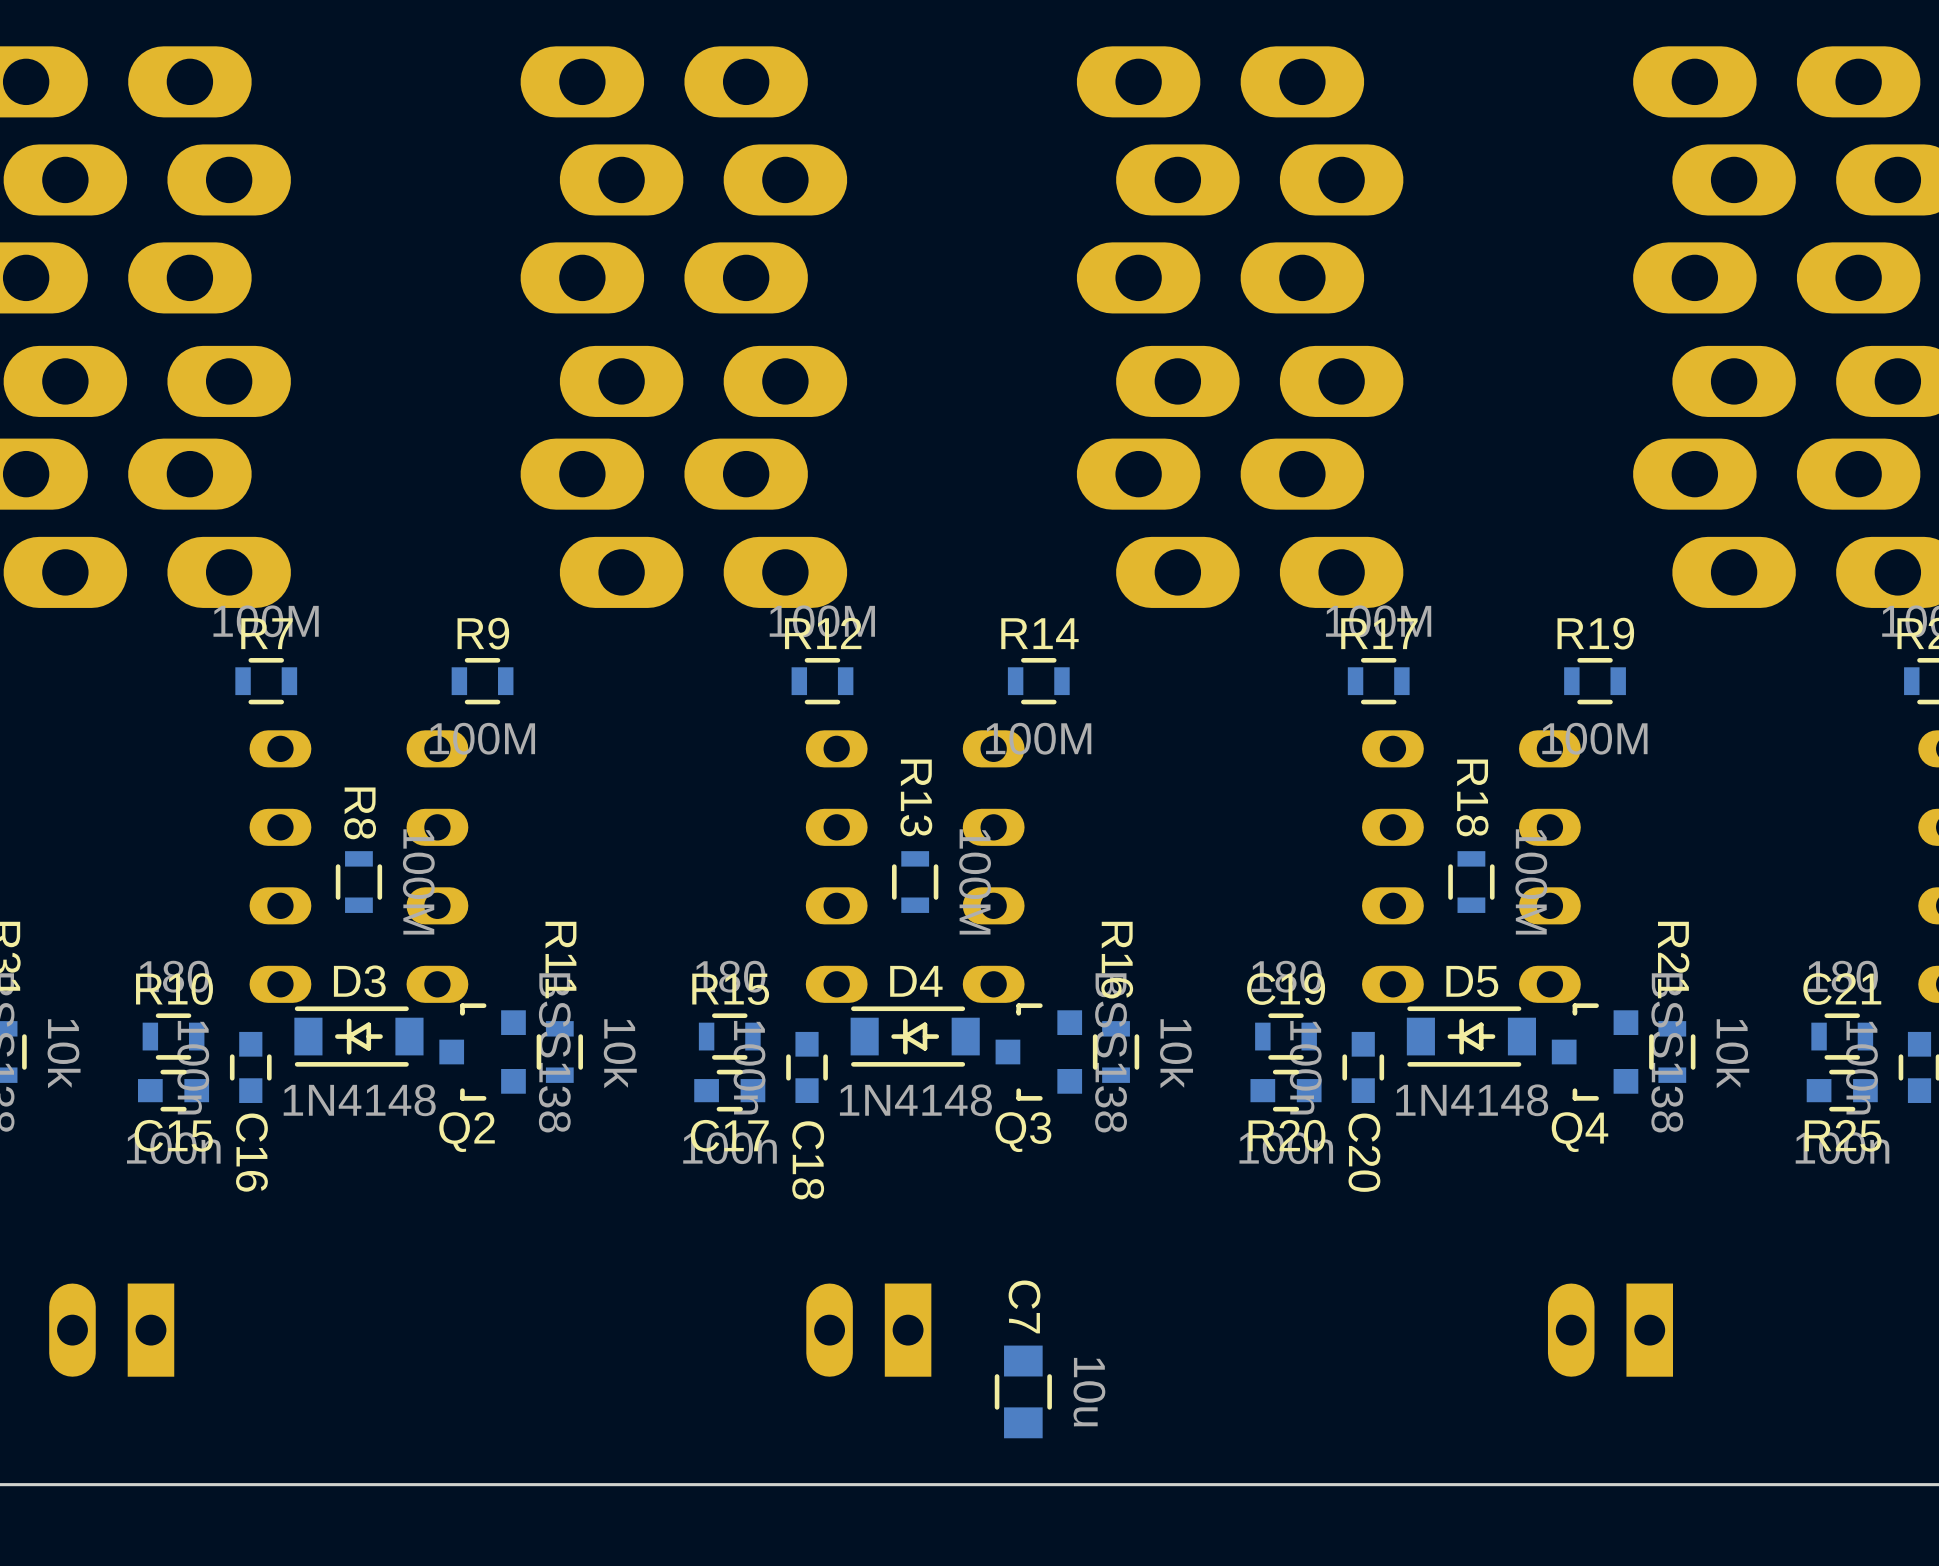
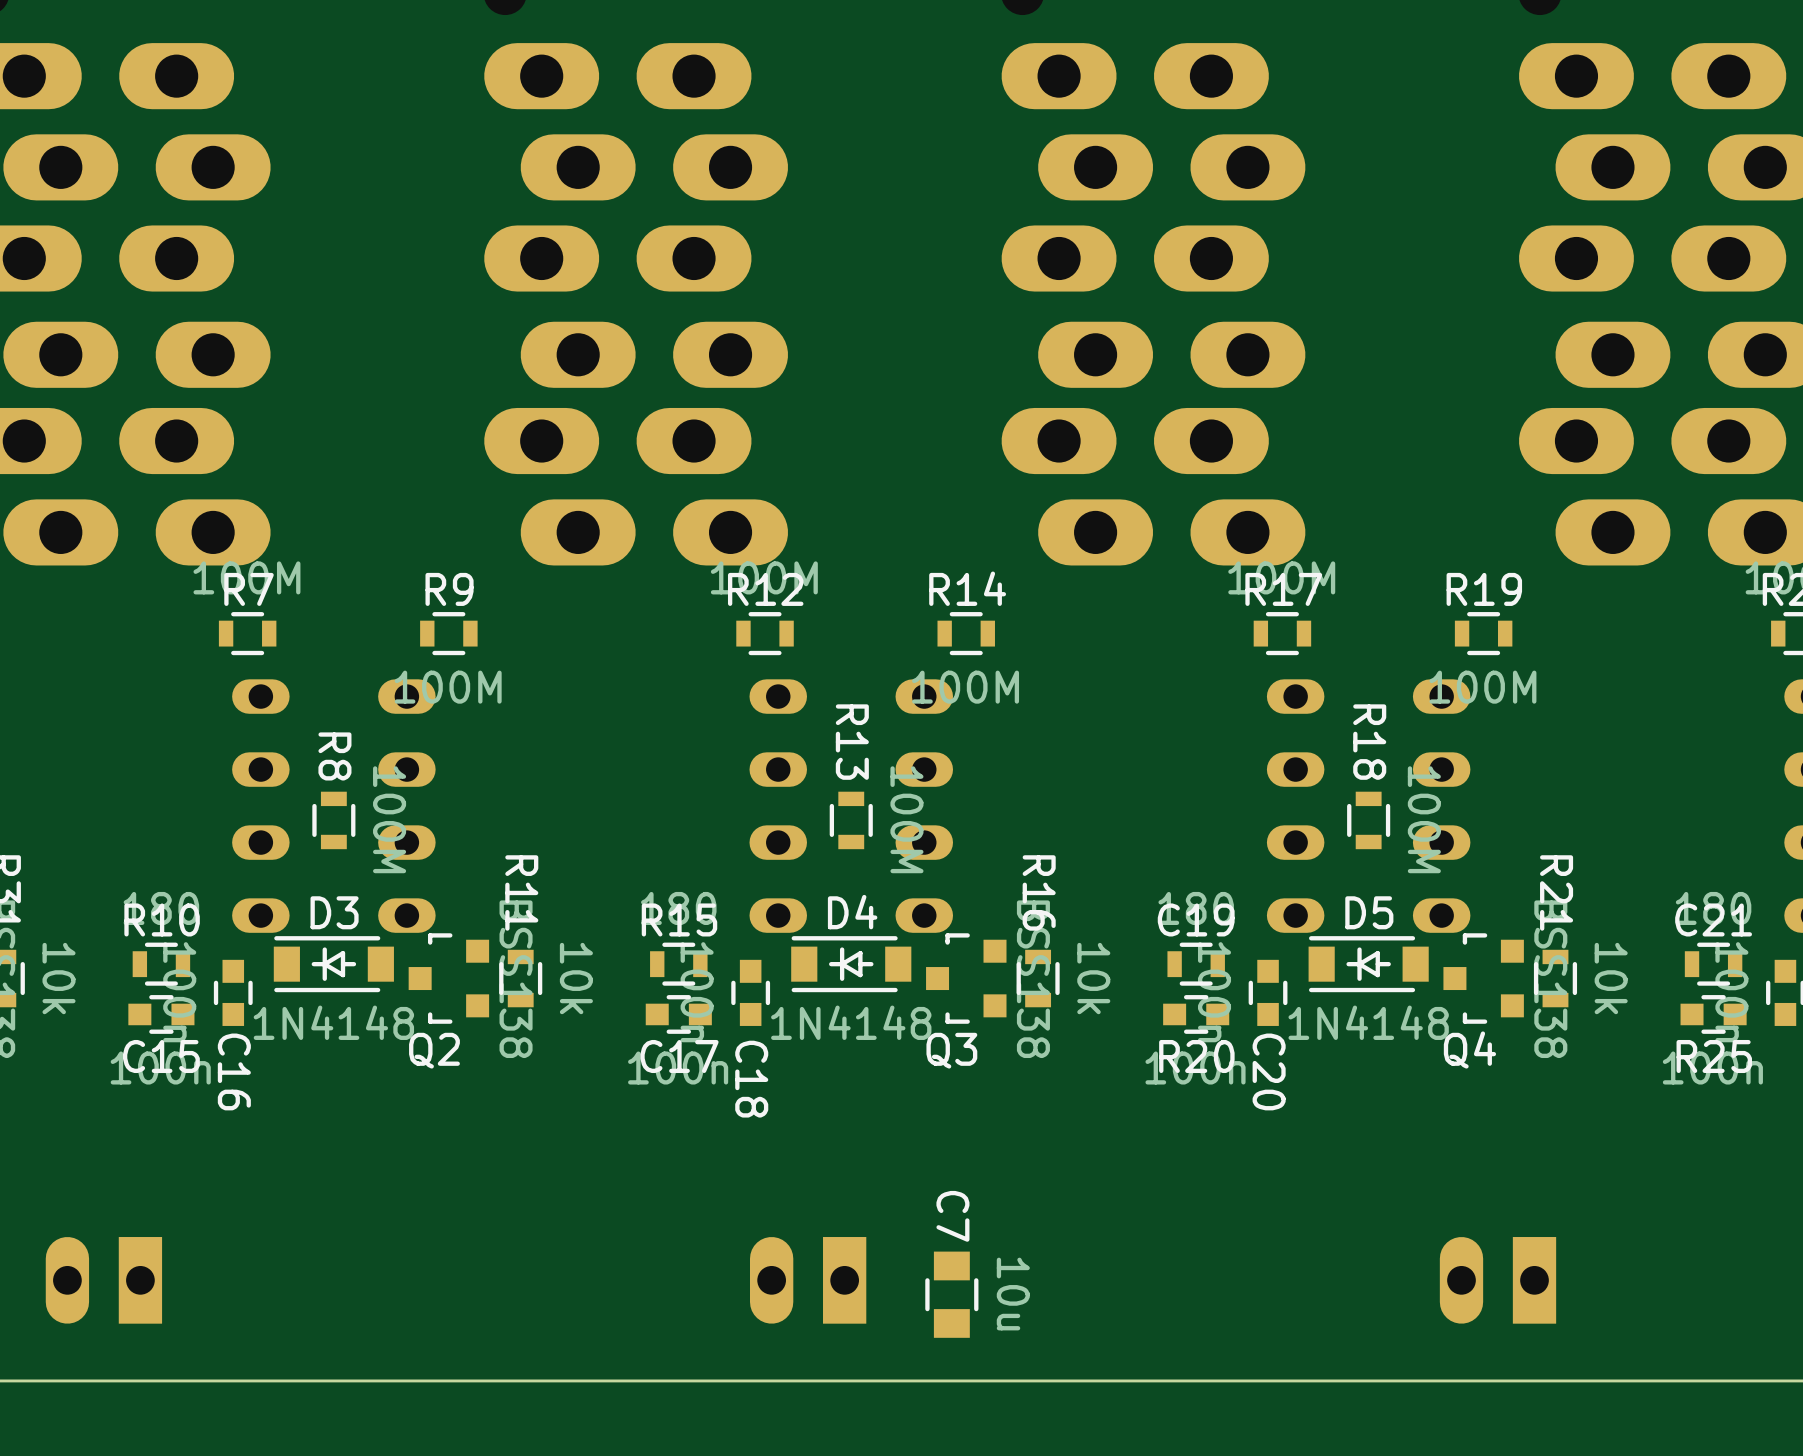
part position: (111, 1330) -> (103, 1280)
part position: (868, 1330) -> (808, 1280)
part position: (1610, 1330) -> (1498, 1280)

